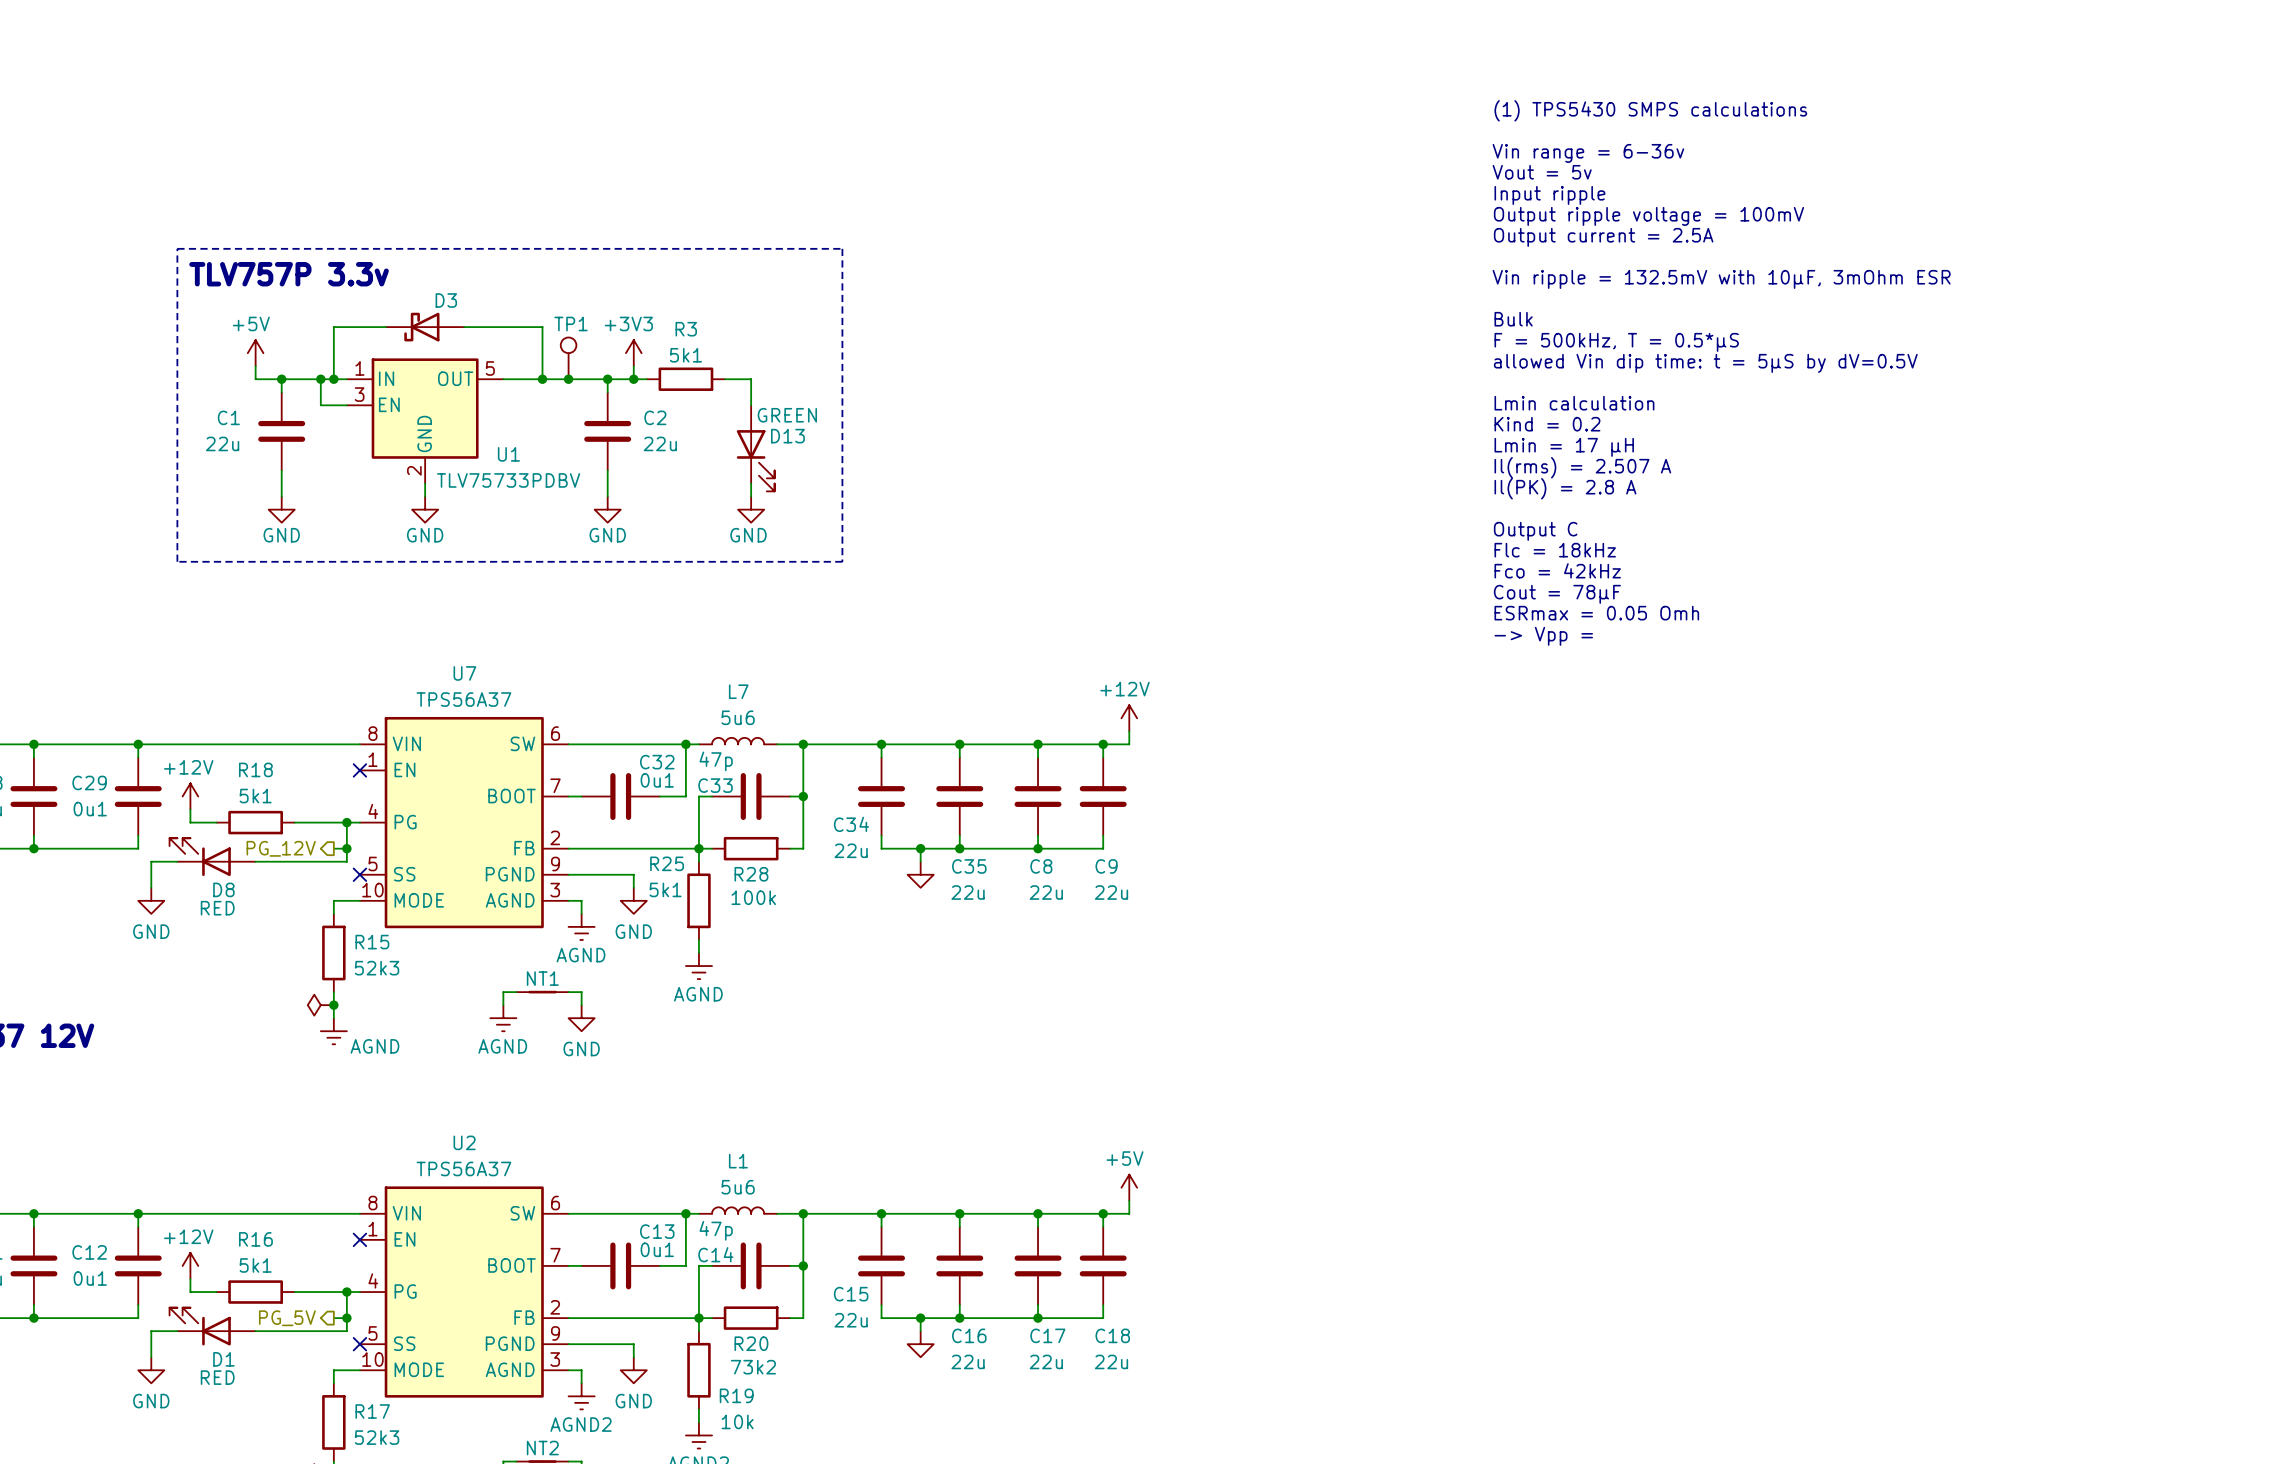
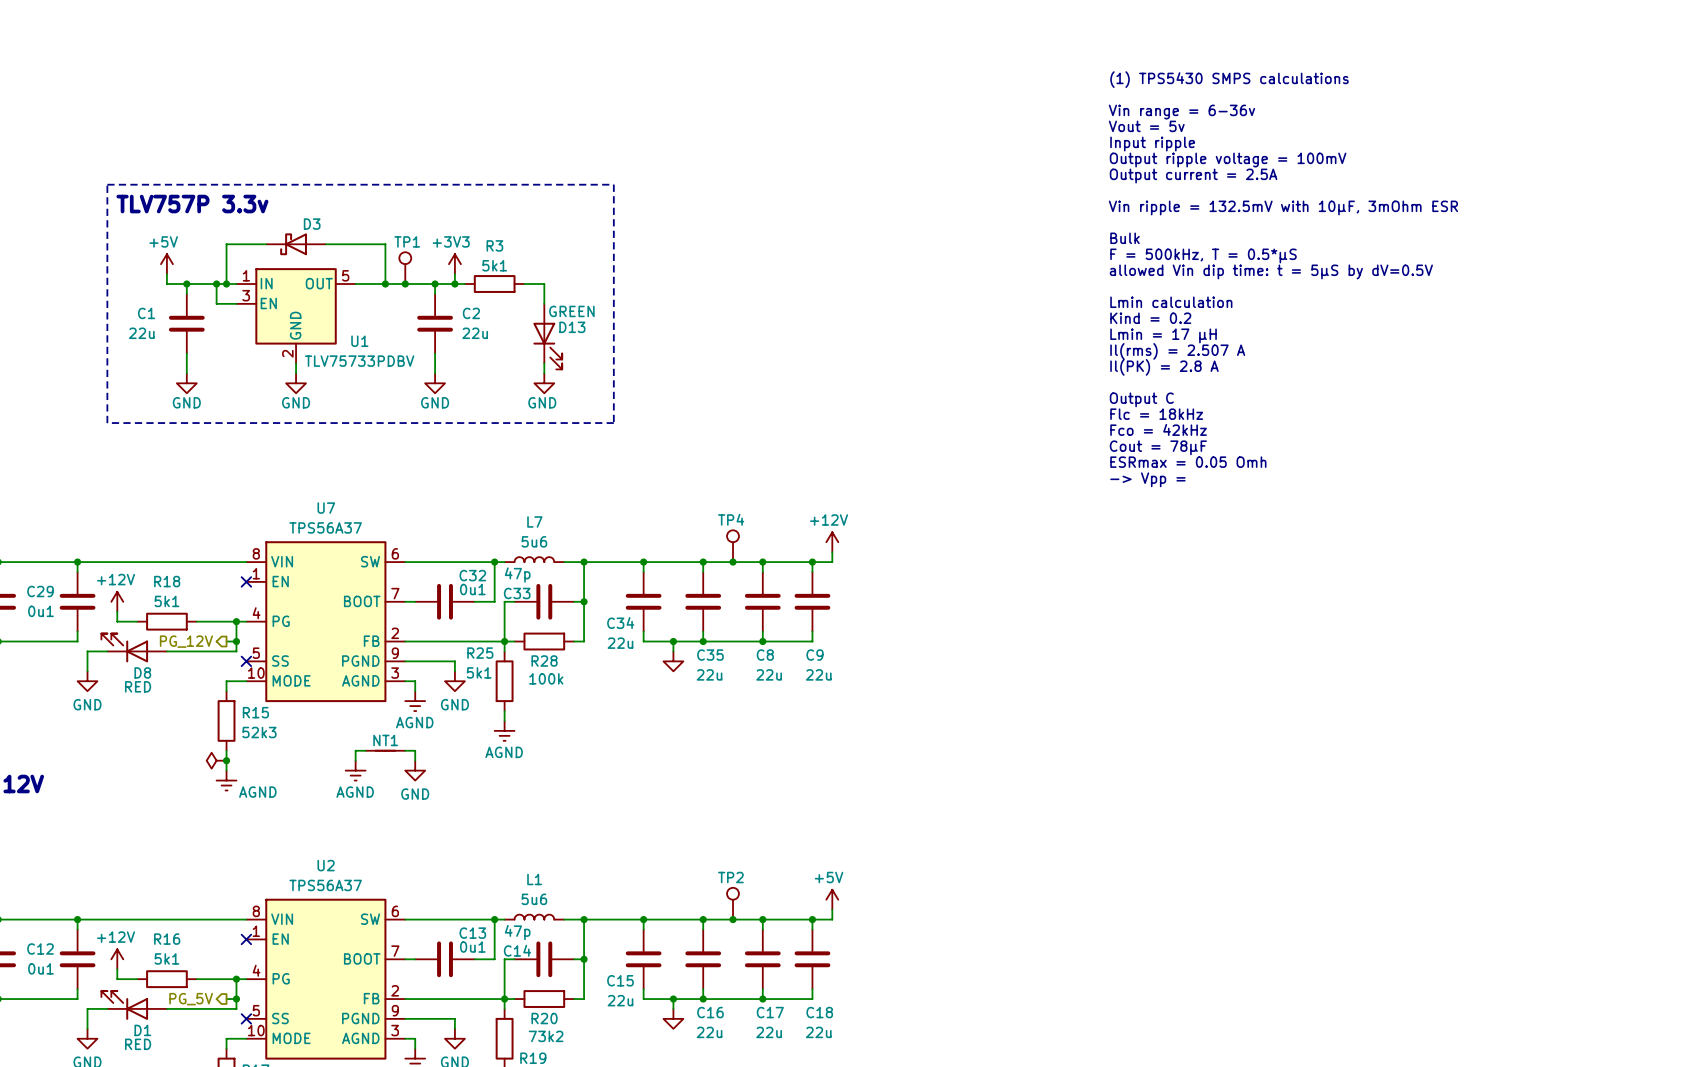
TP4: none -> (733, 546)
junction: none -> (733, 562)
TP2: none -> (733, 903)
junction: none -> (733, 919)

